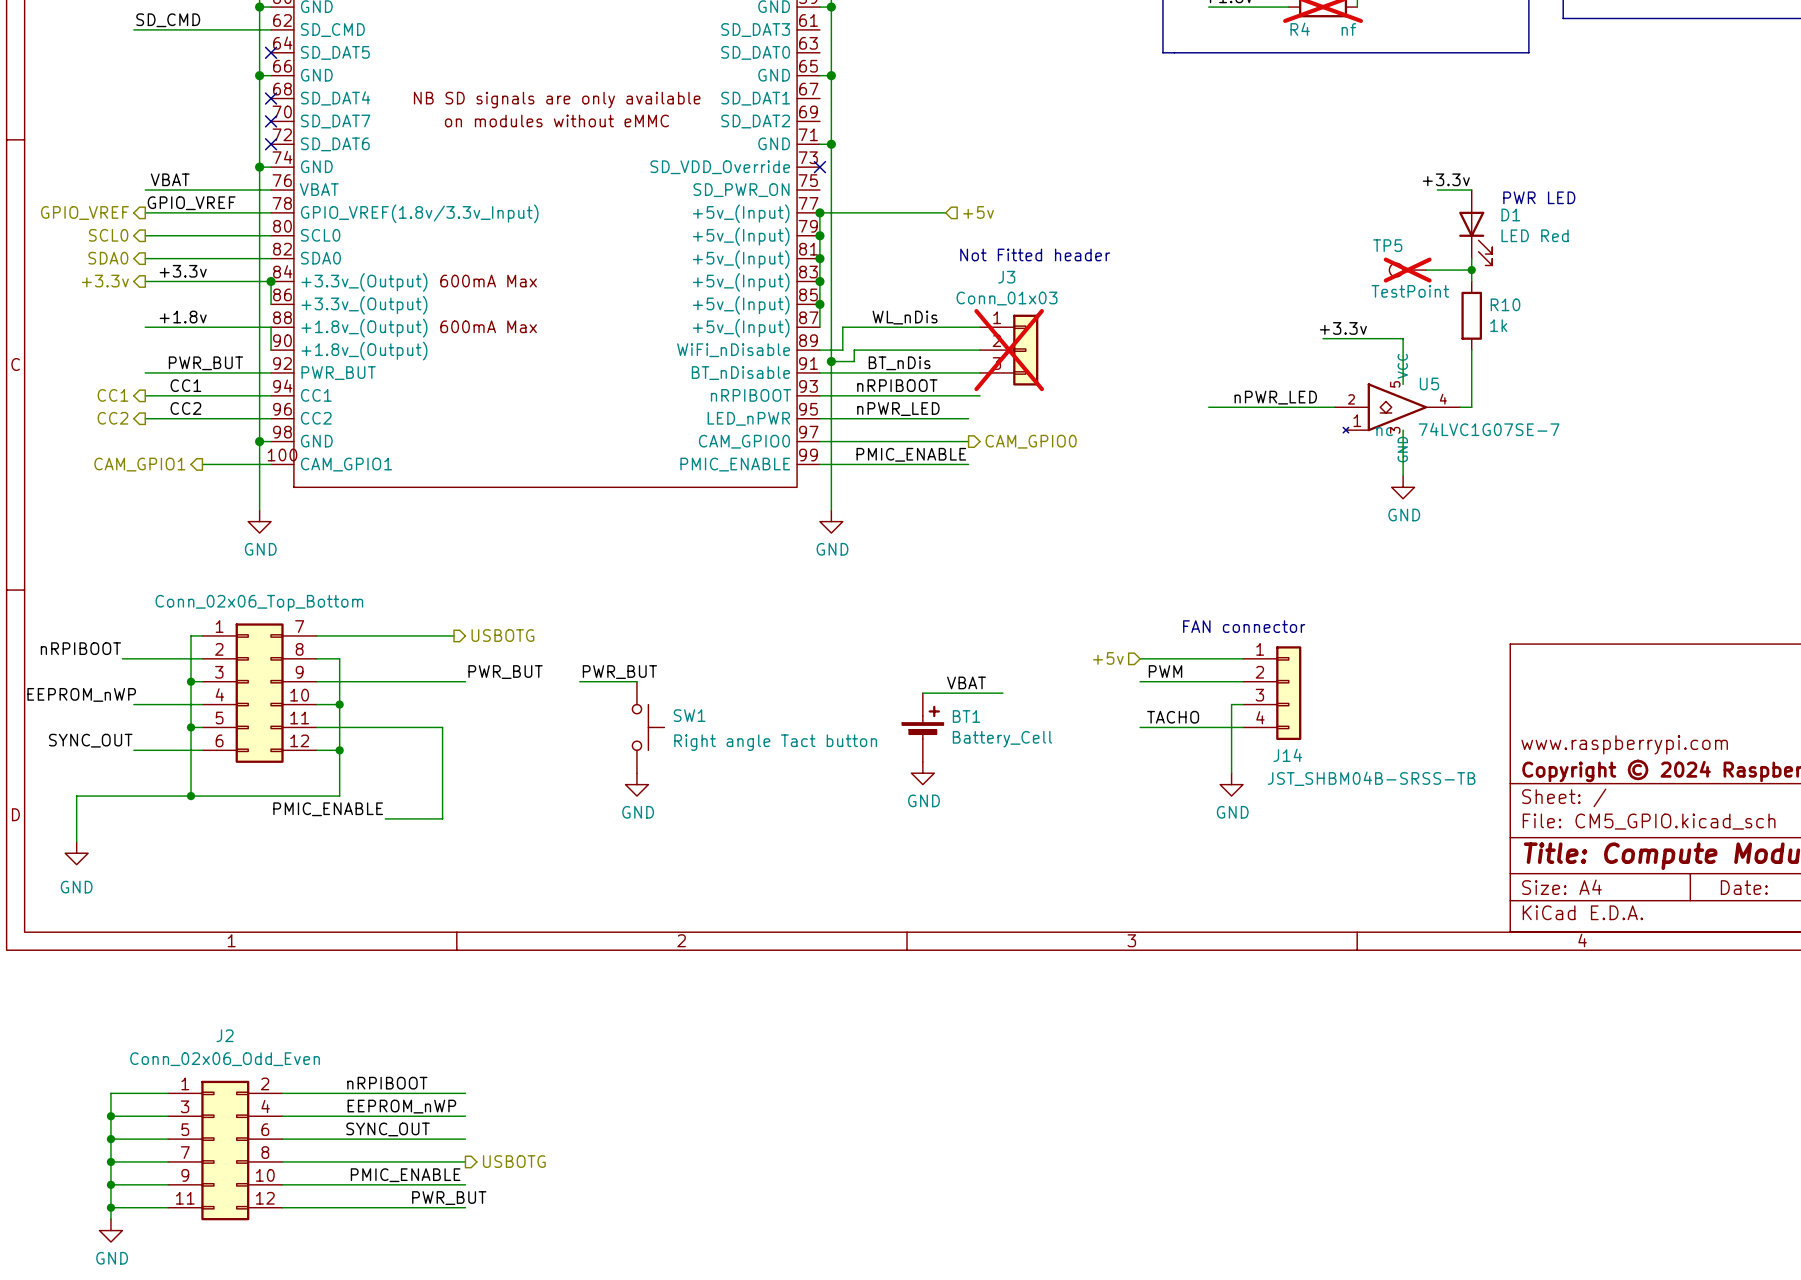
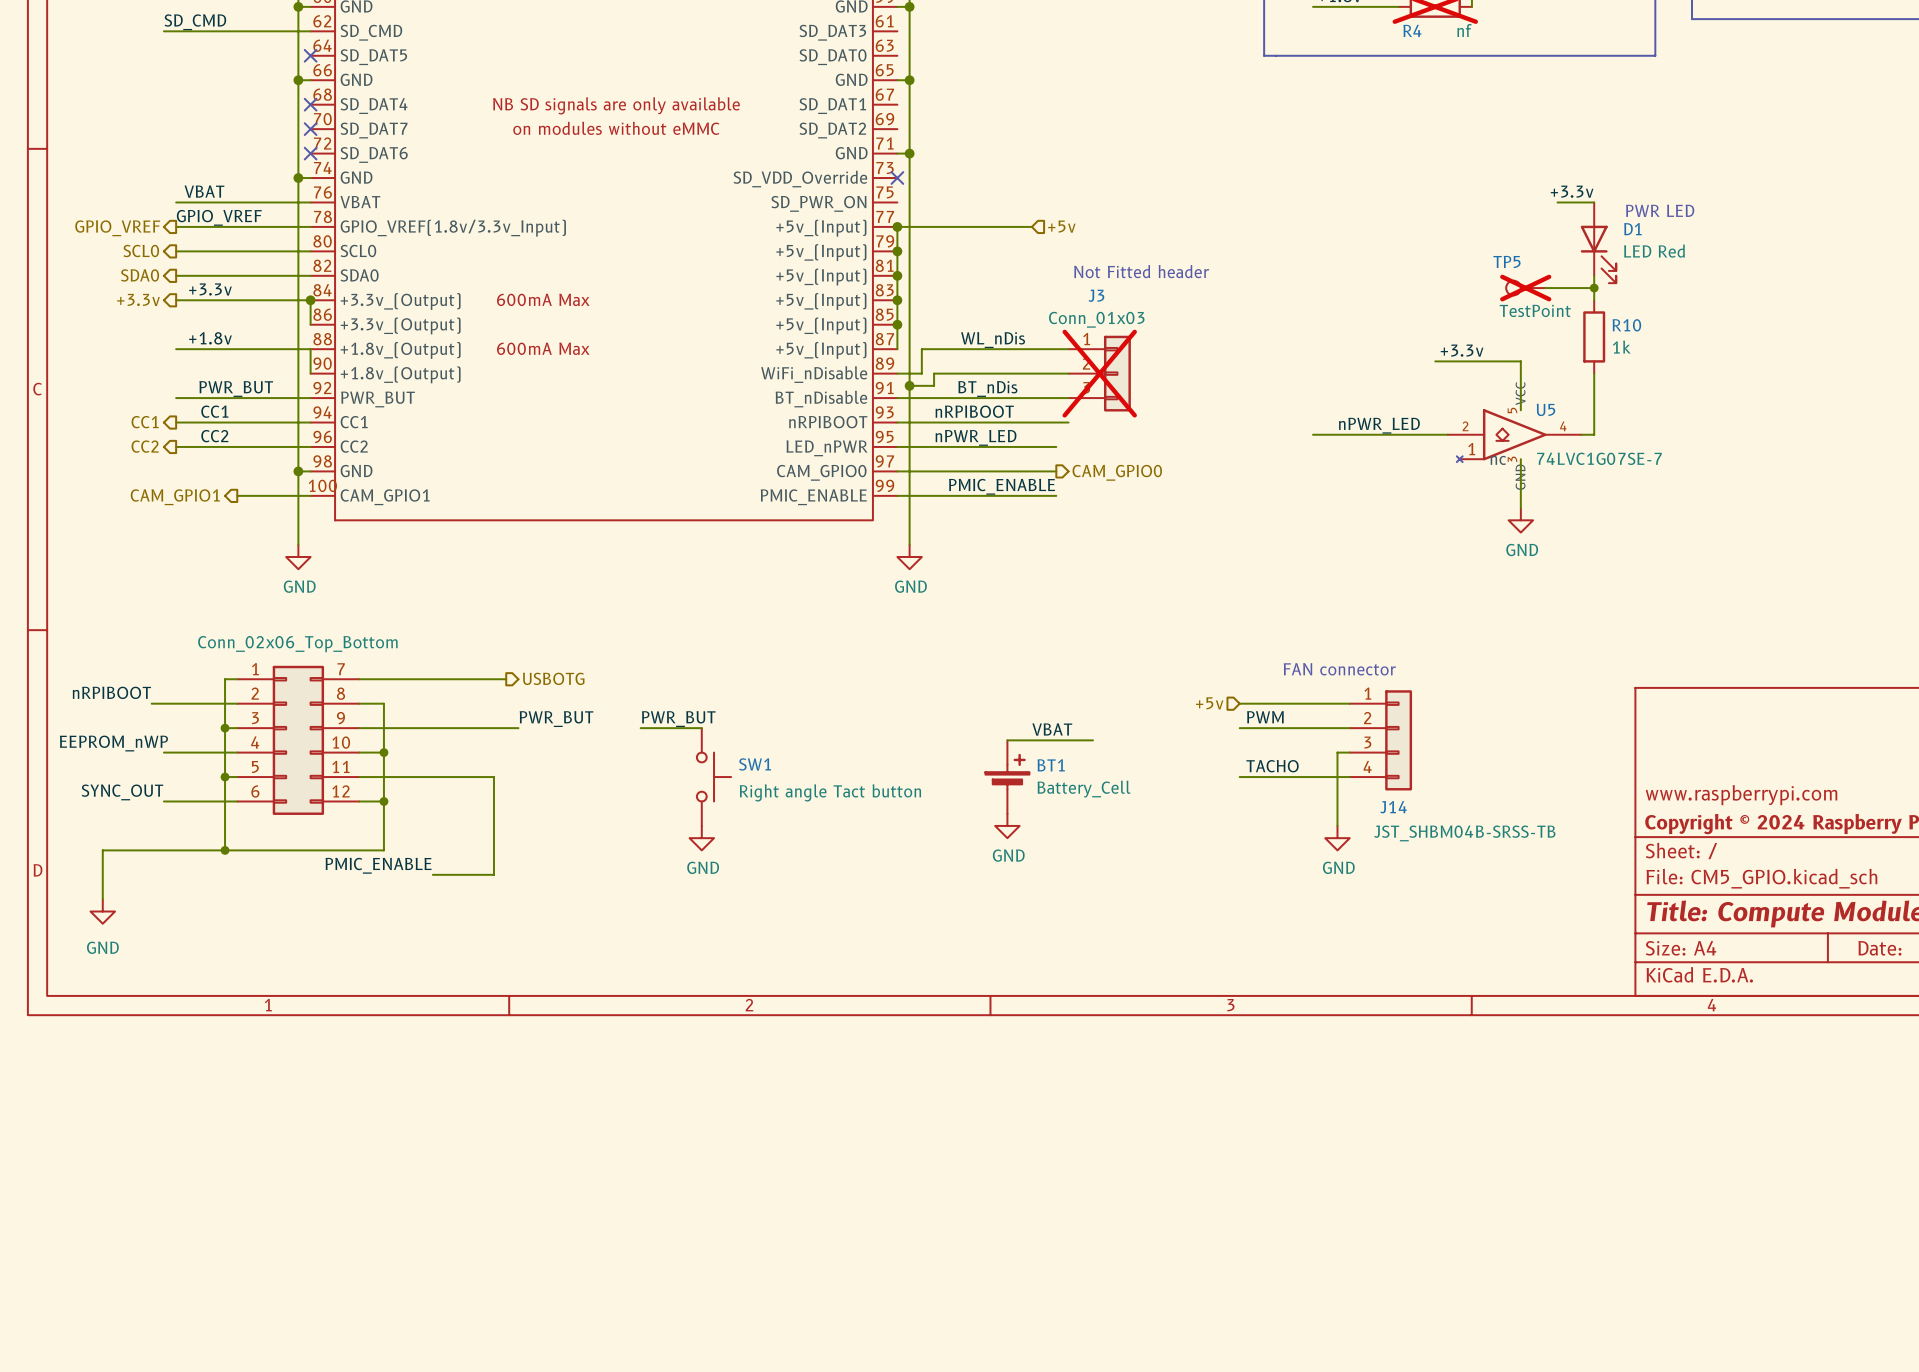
label: nRPIBOOT (387, 1083) -> none
wire: (168, 1093) (110, 1093) (110, 1219) -> none
wire: (282, 1093) (465, 1093) -> none
label: EEPROM_nWP (401, 1106) -> none
wire: (110, 1116) (168, 1116) -> none
junction: (110, 1116) -> none
wire: (282, 1116) (465, 1116) -> none
label: SYNC_OUT (388, 1129) -> none
wire: (110, 1139) (168, 1139) -> none
junction: (110, 1139) -> none
wire: (282, 1139) (465, 1139) -> none
J2: Conn_02x06_Odd_Even (225, 1150) -> none
wire: (110, 1161) (168, 1161) -> none
junction: (110, 1161) -> none
wire: (282, 1161) (465, 1161) -> none
hierarchical label: USBOTG (514, 1161) -> none
label: PMIC_ENABLE (405, 1175) -> none
wire: (110, 1184) (168, 1184) -> none
junction: (110, 1184) -> none
wire: (282, 1184) (465, 1184) -> none
label: PWR_BUT (449, 1198) -> none
wire: (110, 1207) (168, 1207) -> none
junction: (110, 1207) -> none
wire: (282, 1207) (465, 1207) -> none
power symbol: GND (110, 1230) -> none

